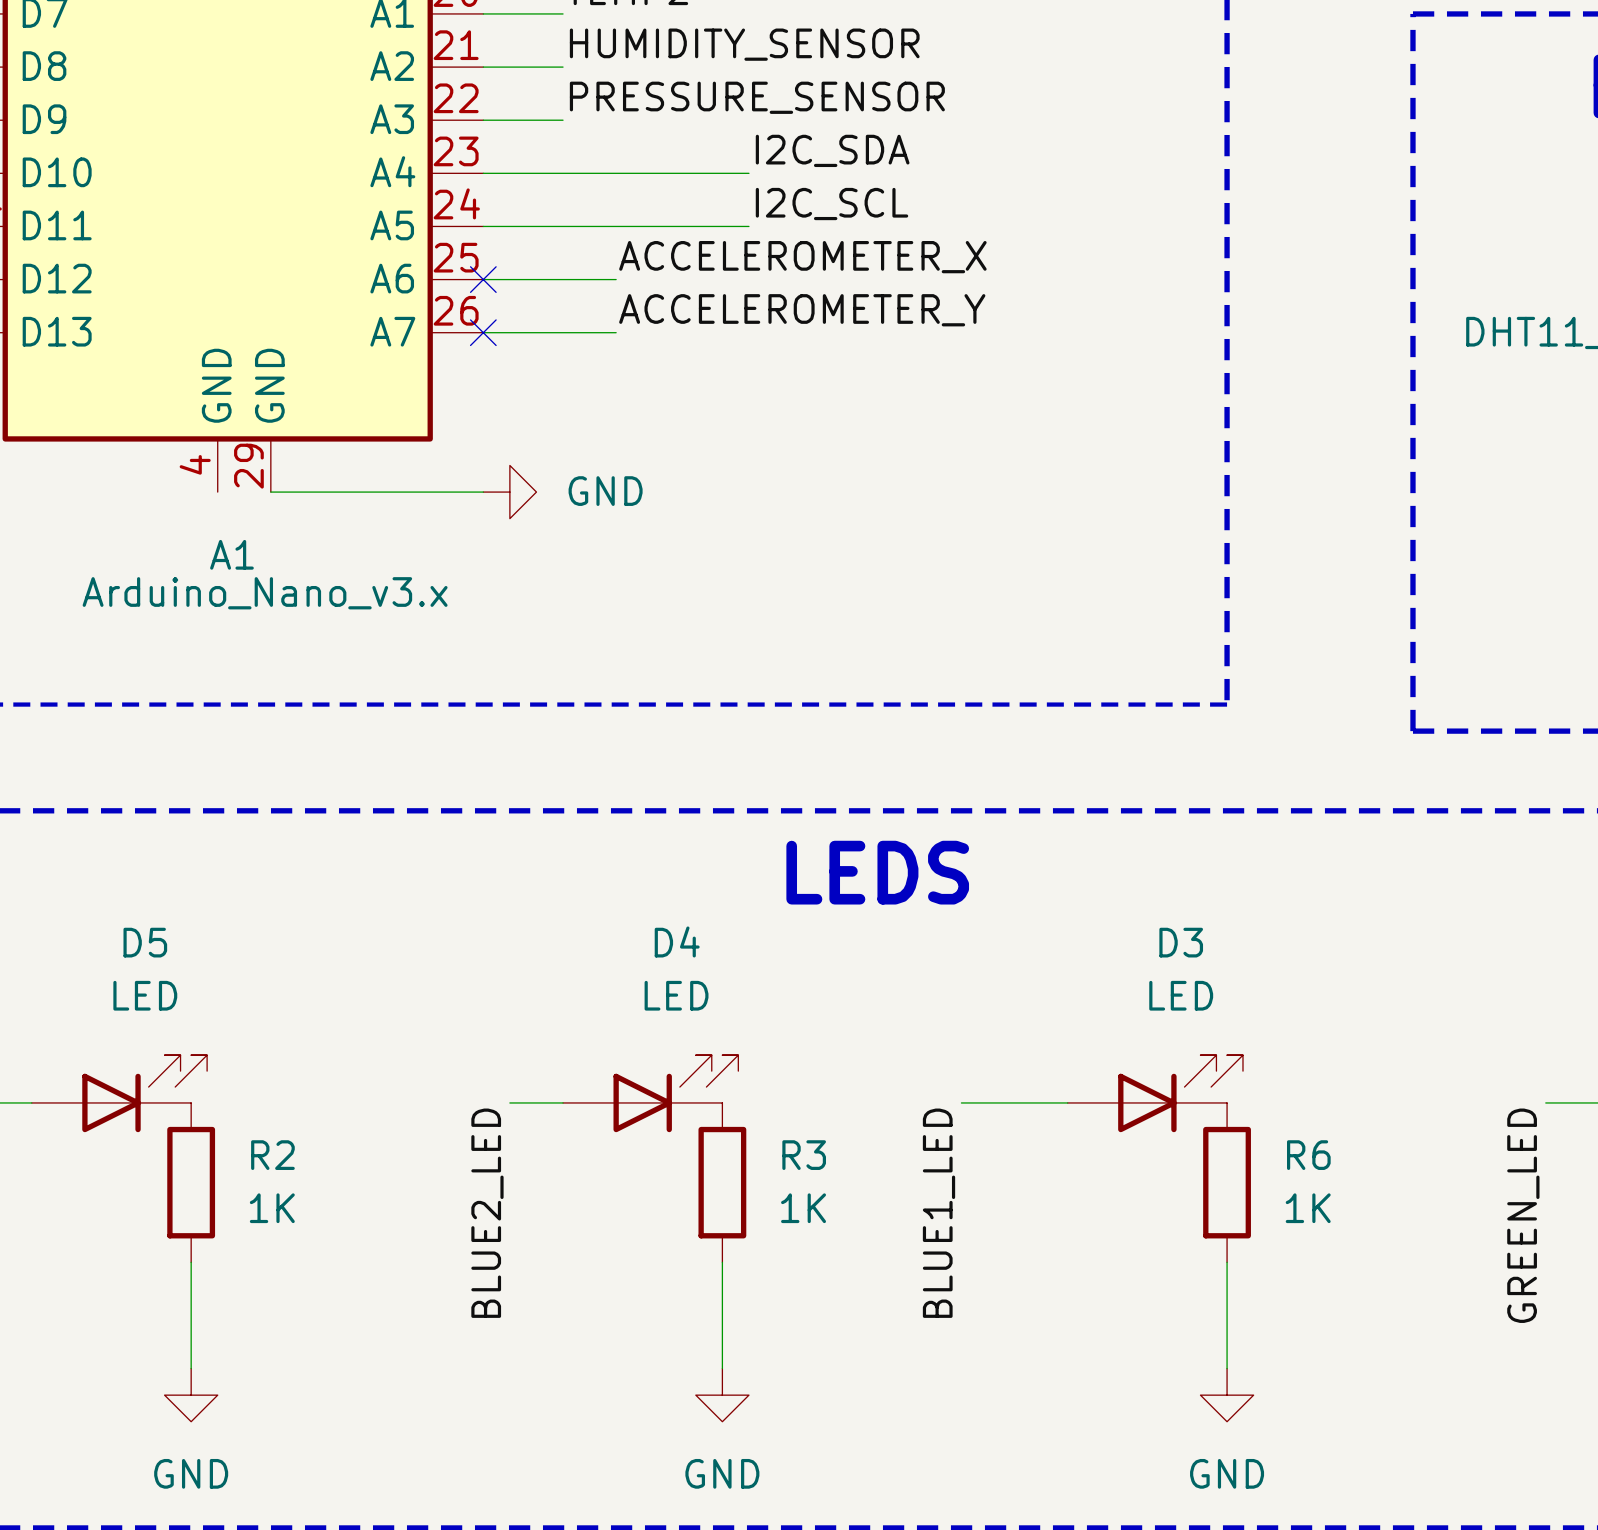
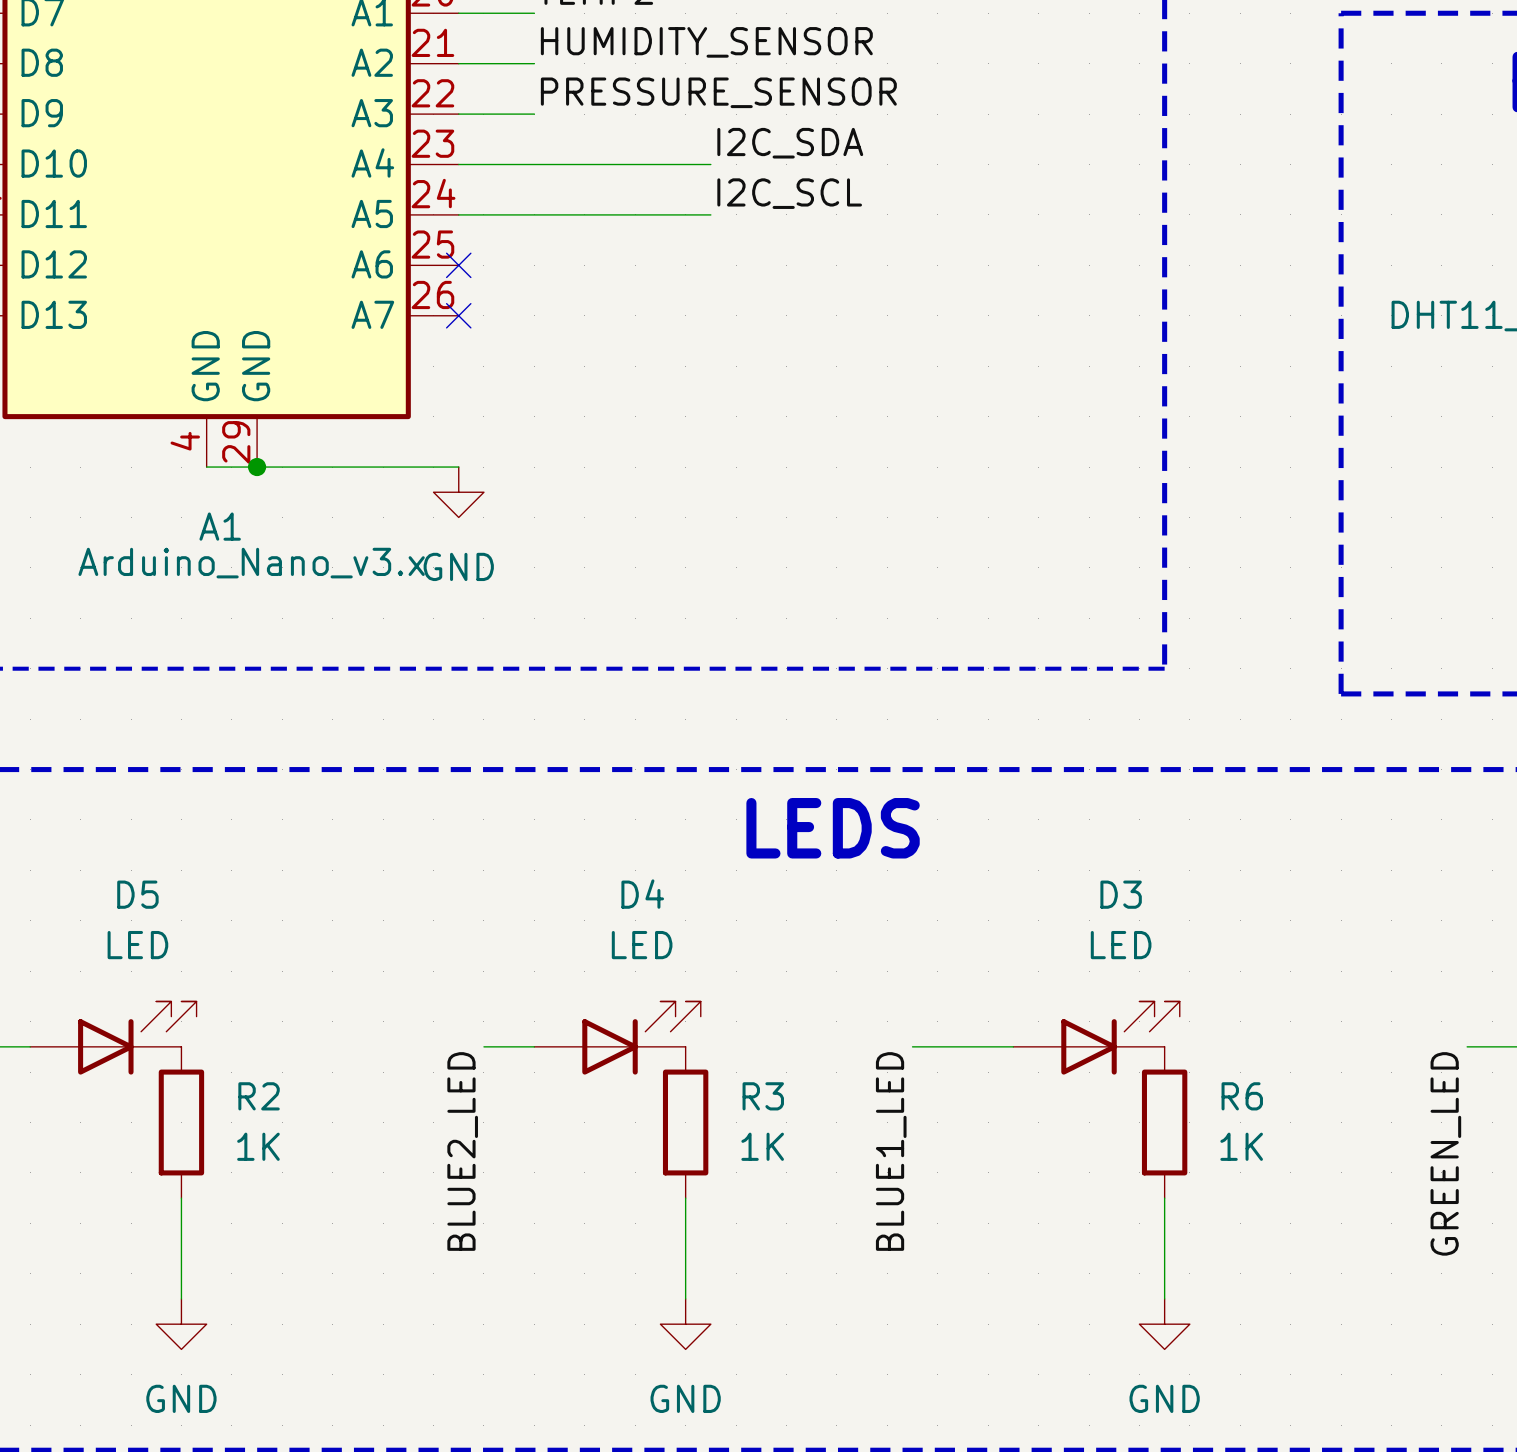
label: ACCELEROMETER_X (802, 257) -> none
wire: (483, 279) (616, 279) -> none
label: ACCELEROMETER_Y (802, 310) -> none
wire: (483, 332) (616, 332) -> none
wire: none -> (206, 467) (257, 467)
junction: none -> (257, 467)
power symbol rotation: 0° (509, 492) -> 90° clockwise (458, 492)
power symbol position: GND (509, 492) -> GND (458, 492)

